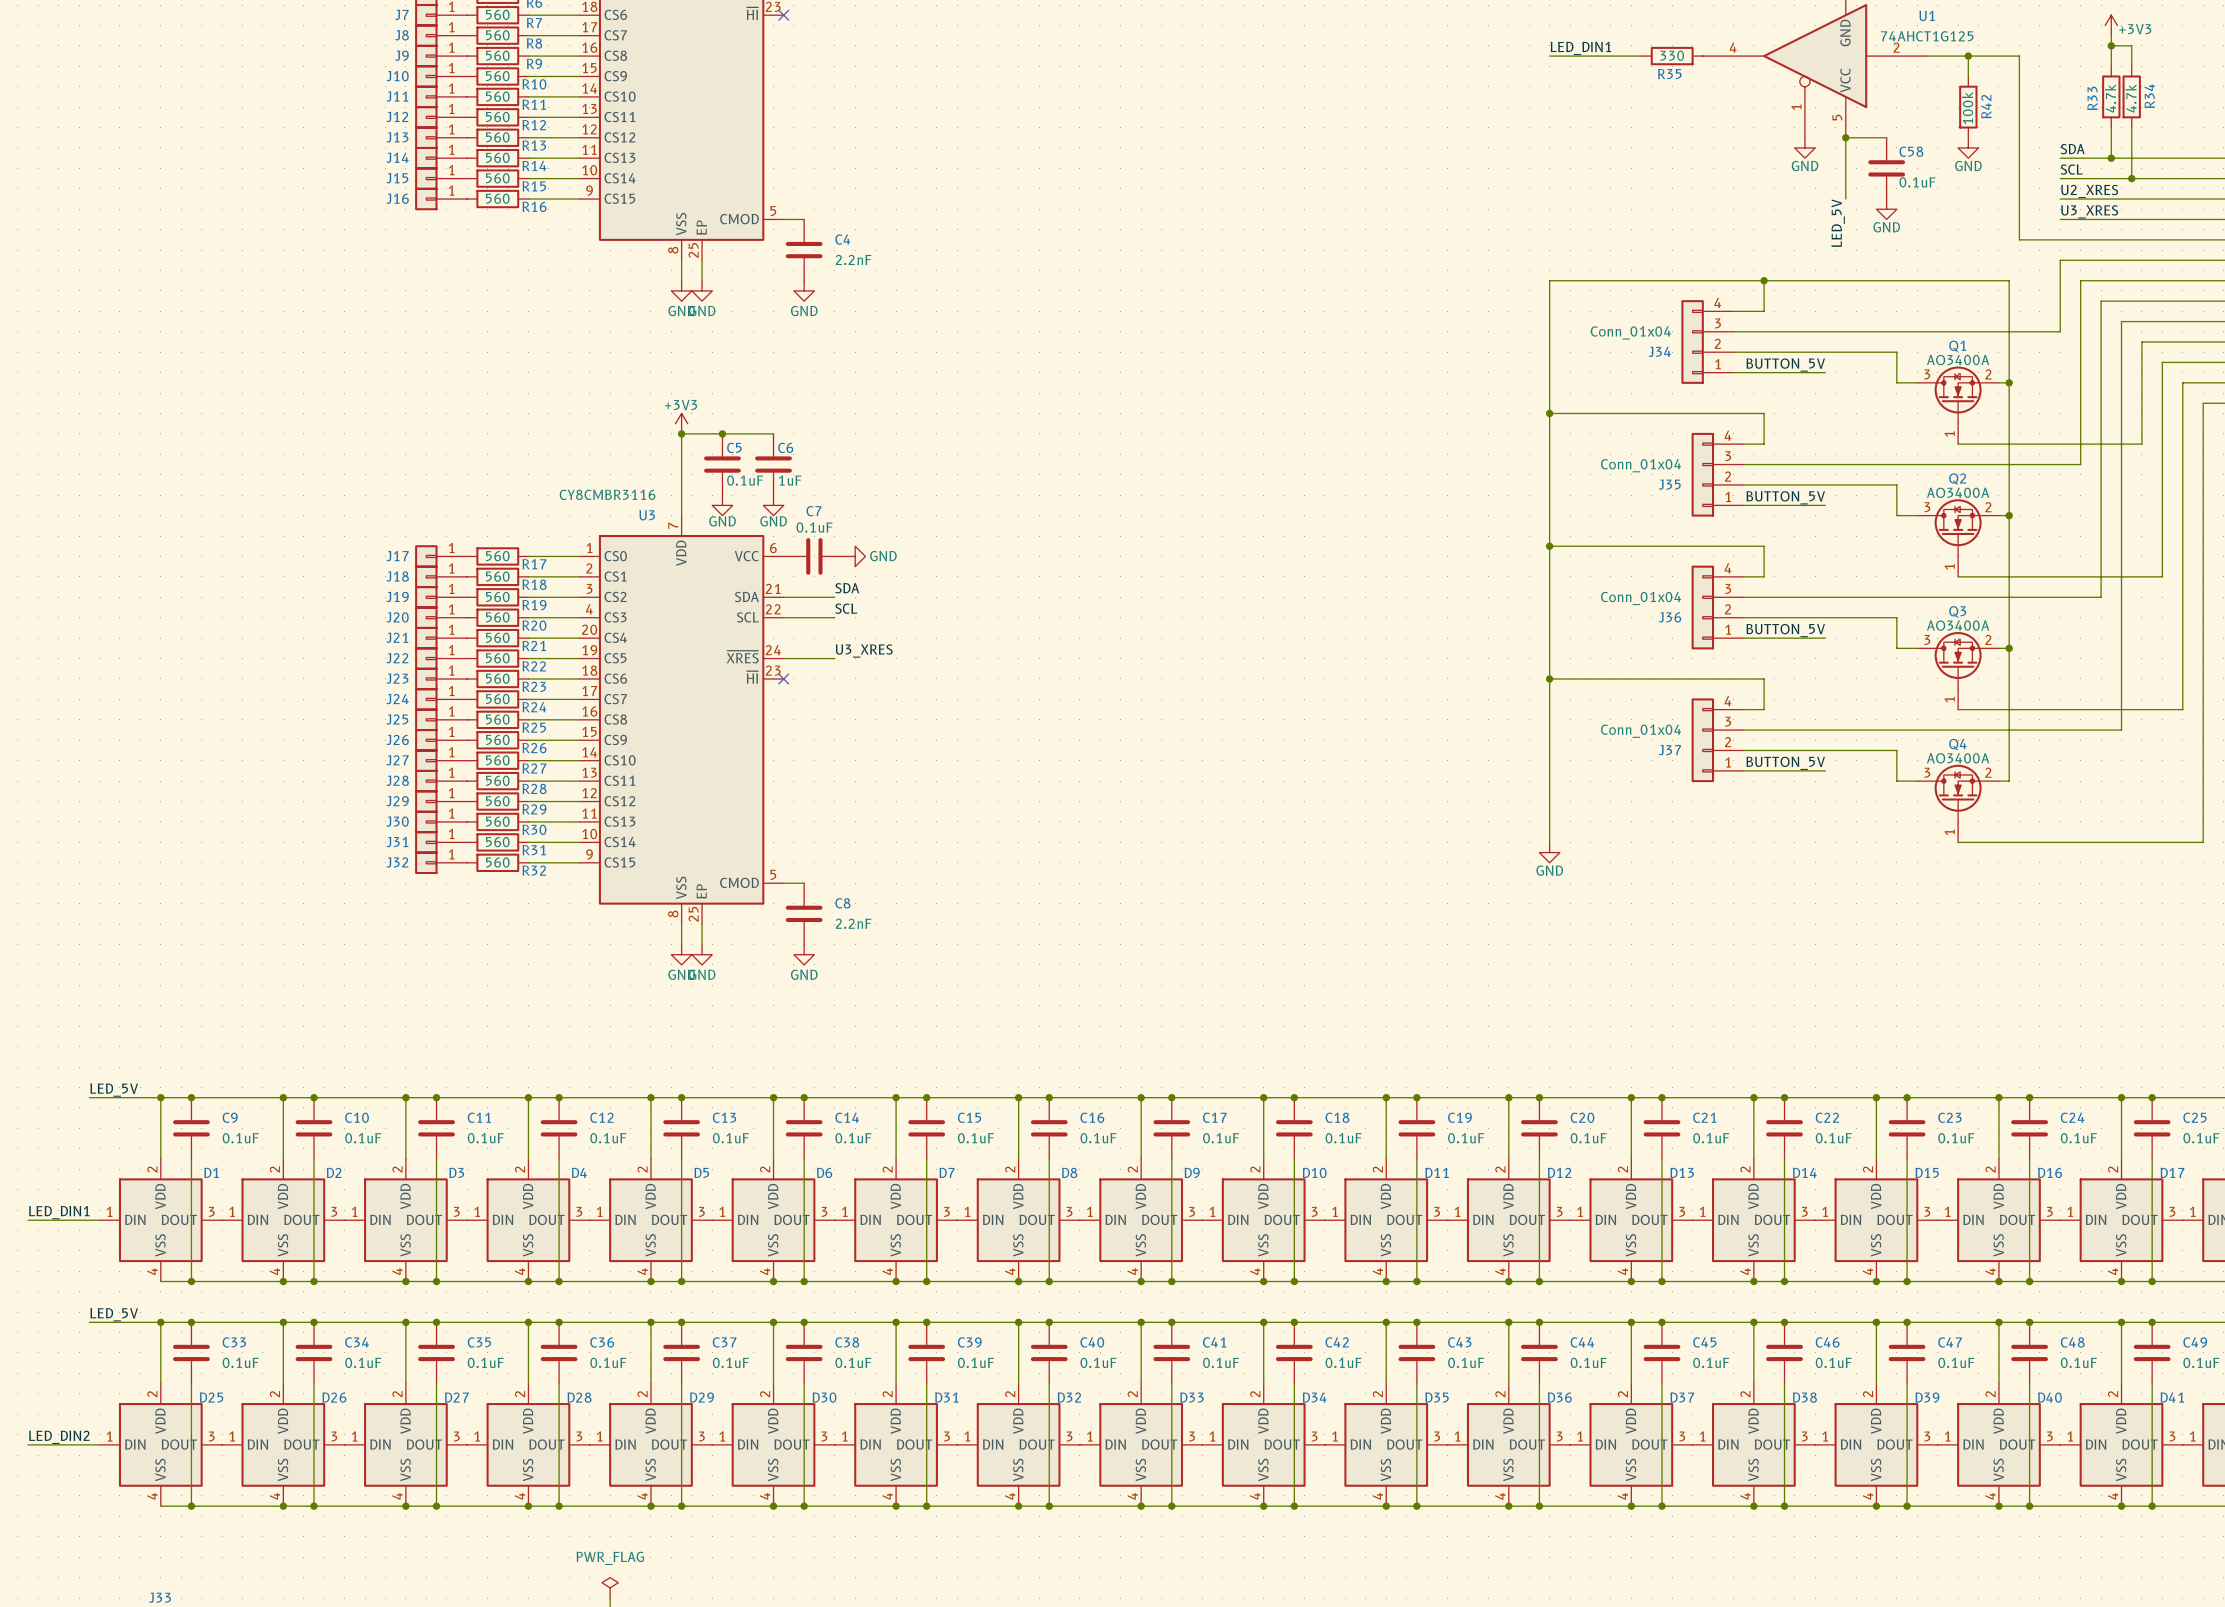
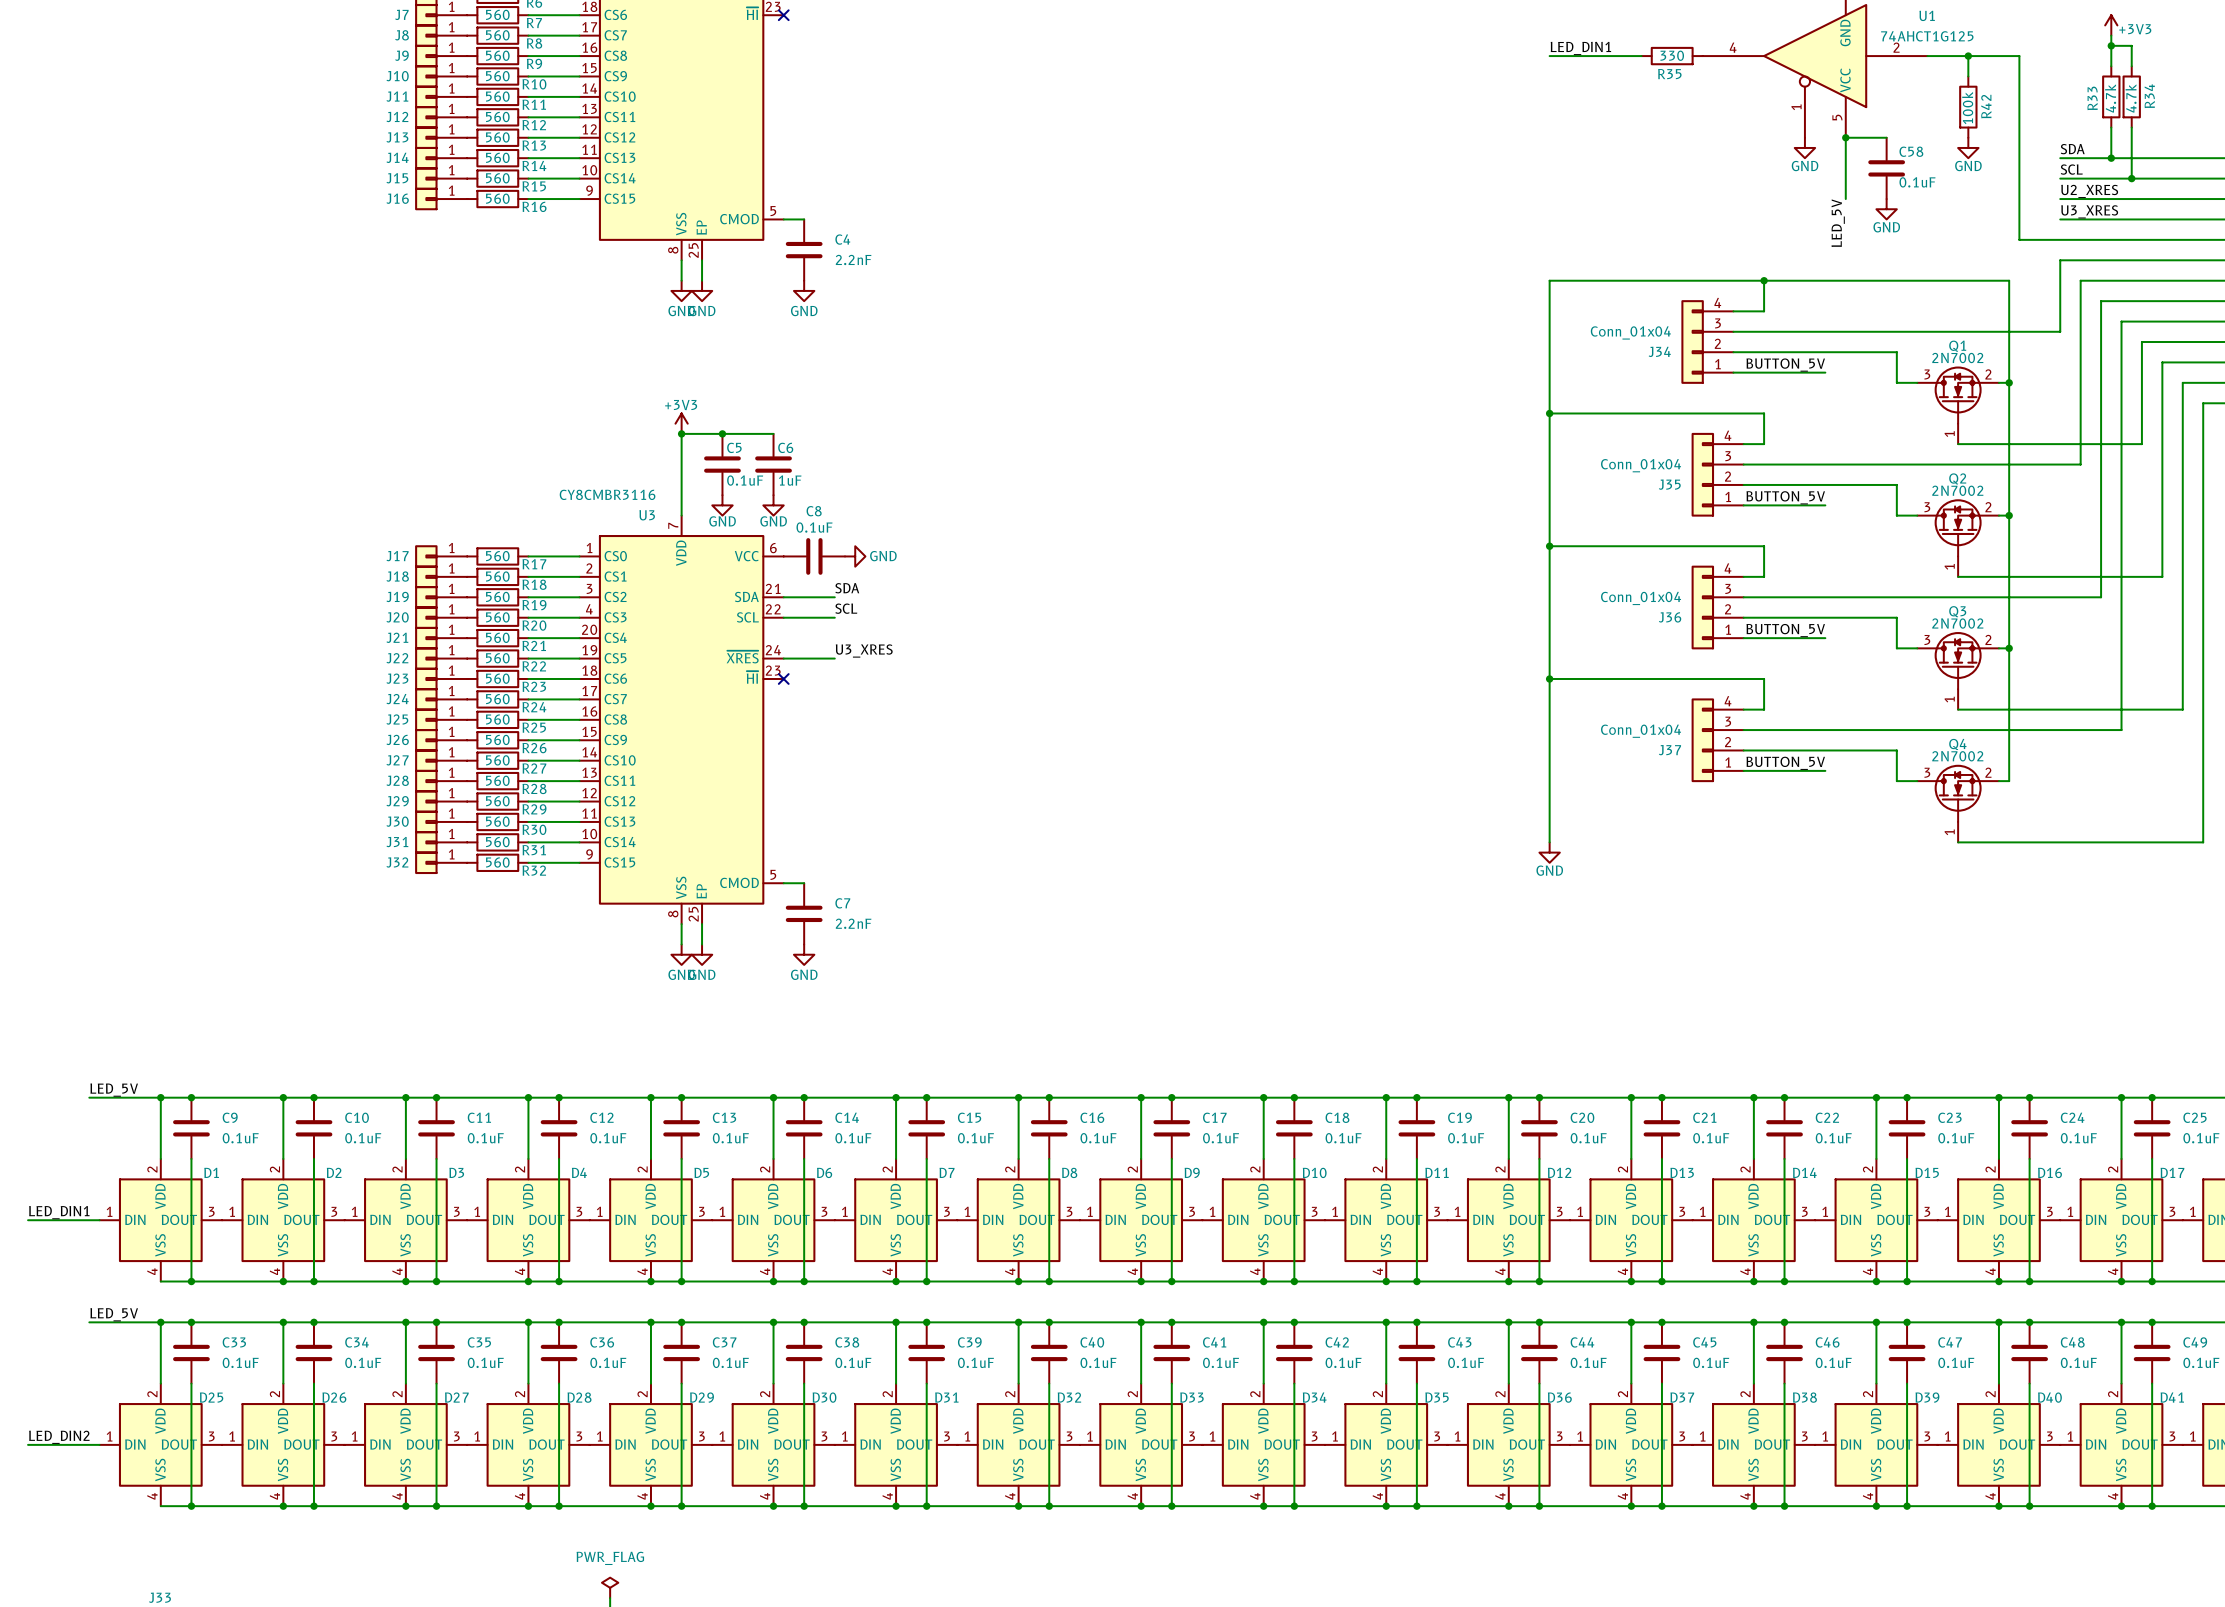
Q1 value: AO3400A (1958, 360) -> 2N7002 (1957, 358)
Q2 value: AO3400A (1958, 492) -> 2N7002 (1957, 490)
C7 name: C7 (814, 511) -> C8 (814, 511)
Q3 value: AO3400A (1958, 625) -> 2N7002 (1957, 623)
Q4 value: AO3400A (1958, 758) -> 2N7002 (1957, 756)
C8 name: C8 (842, 903) -> C7 (842, 903)

